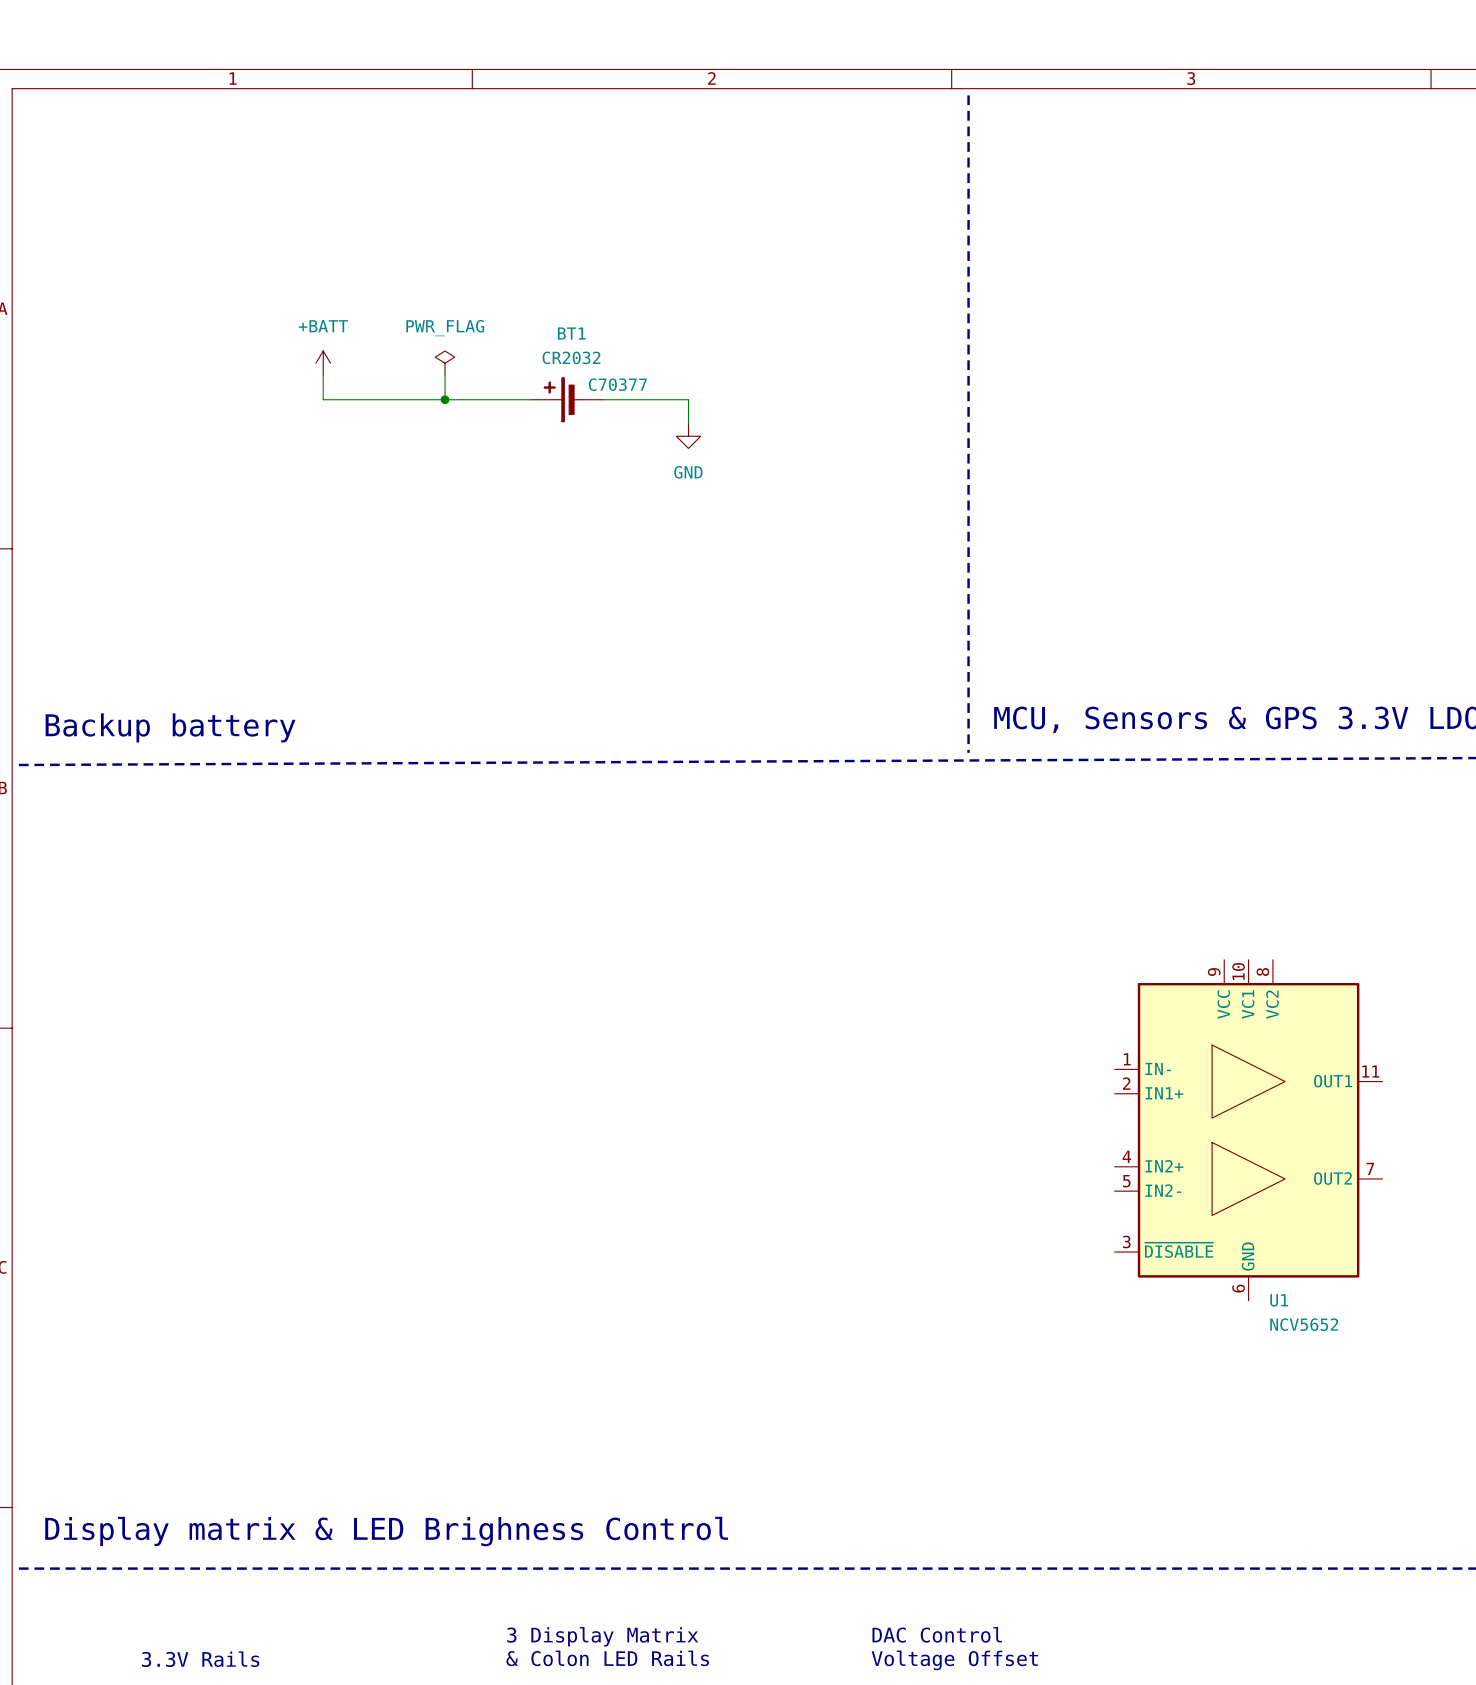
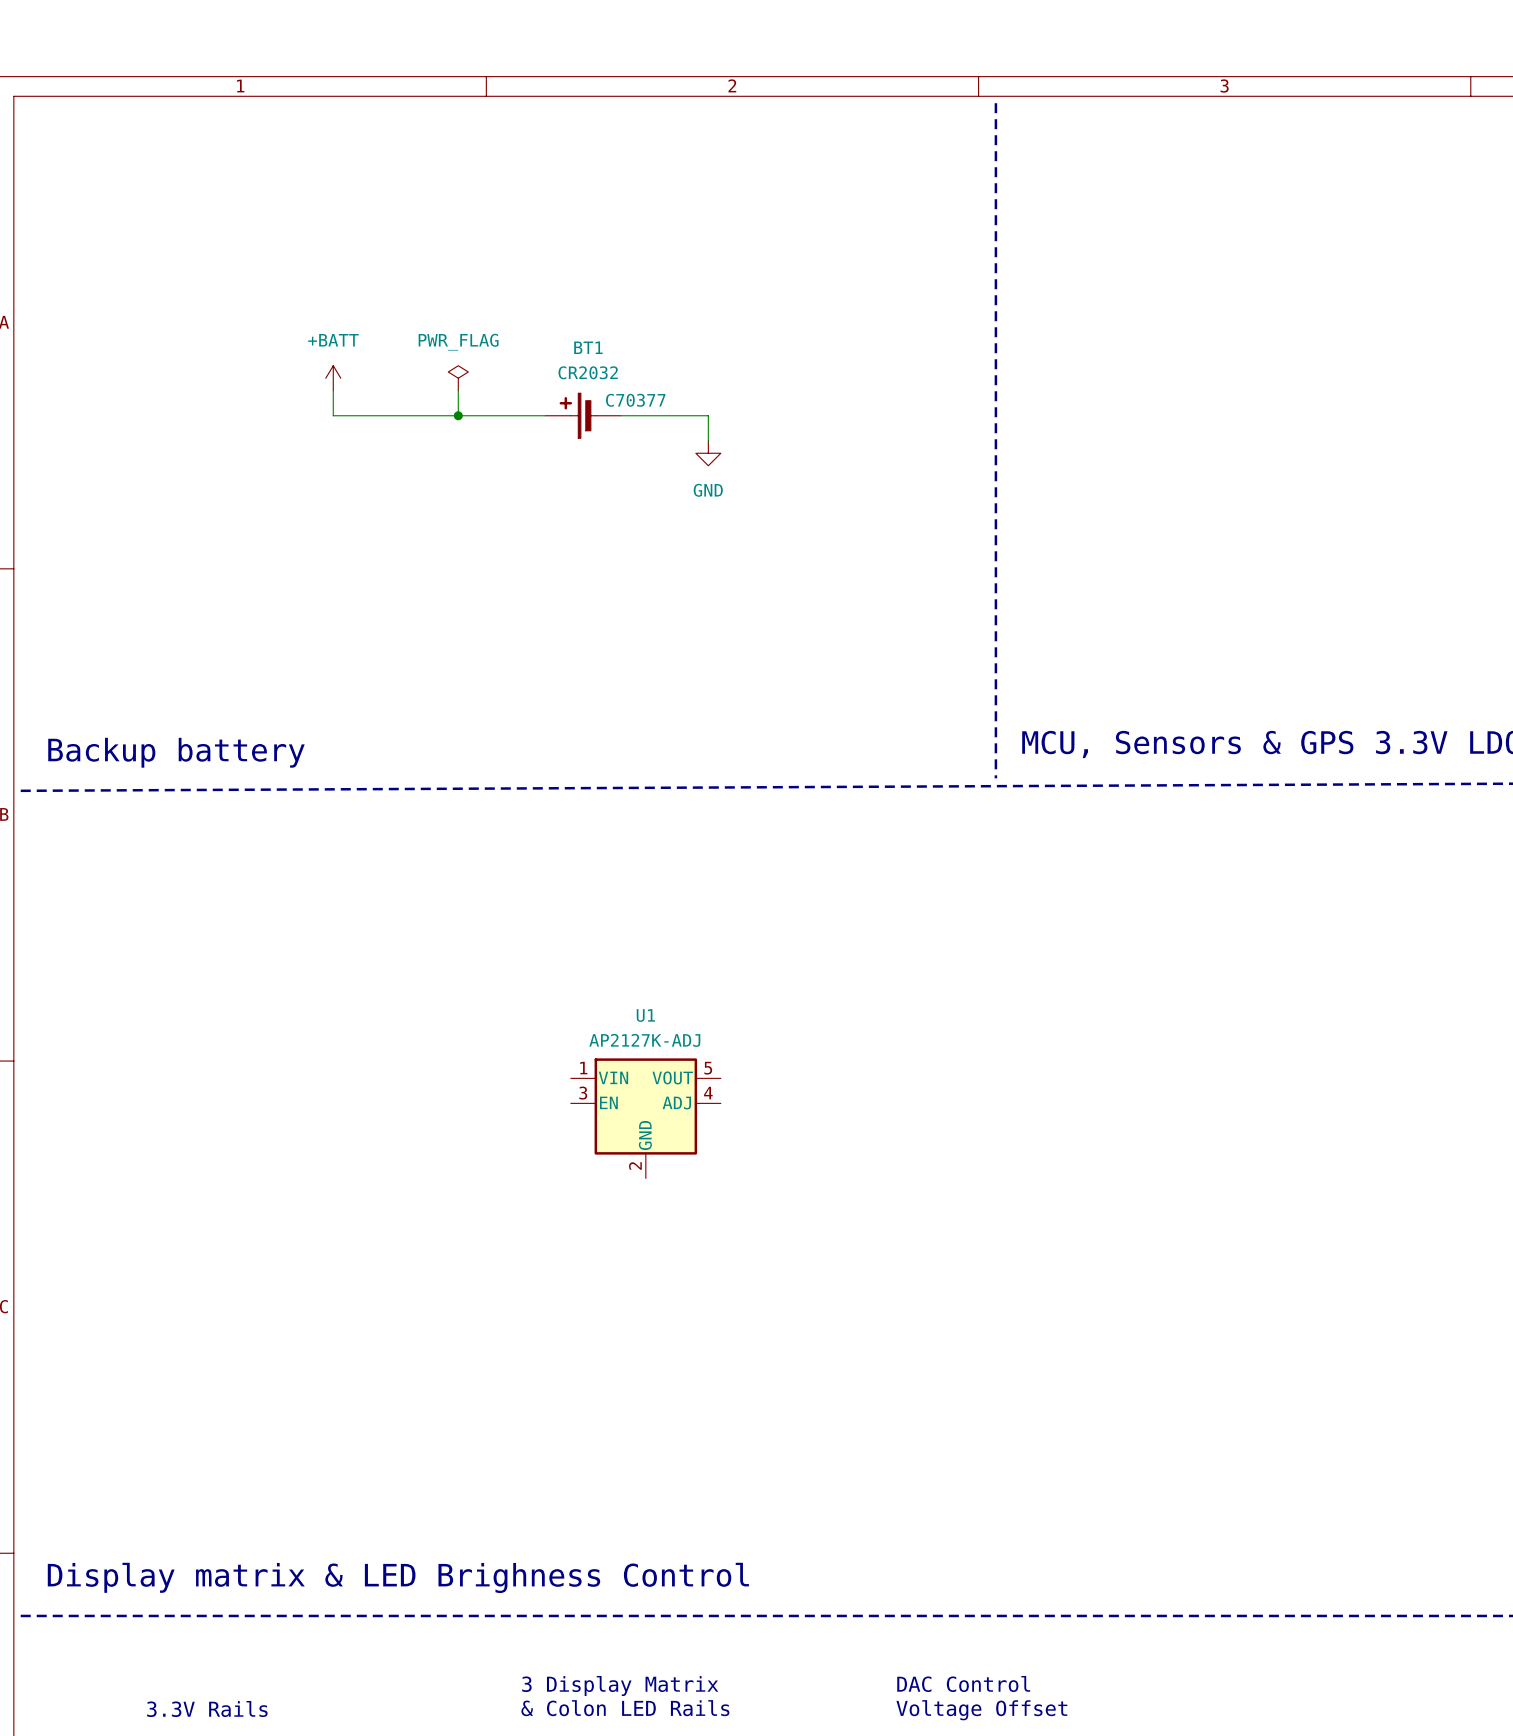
U1 symbol: [1114, 959, 1383, 1301] -> [570, 1058, 721, 1179]
U1 name position: U1 (1279, 1300) -> U1 (645, 1015)
U1 value: NCV5652 (1304, 1324) -> AP2127K-ADJ (644, 1040)

